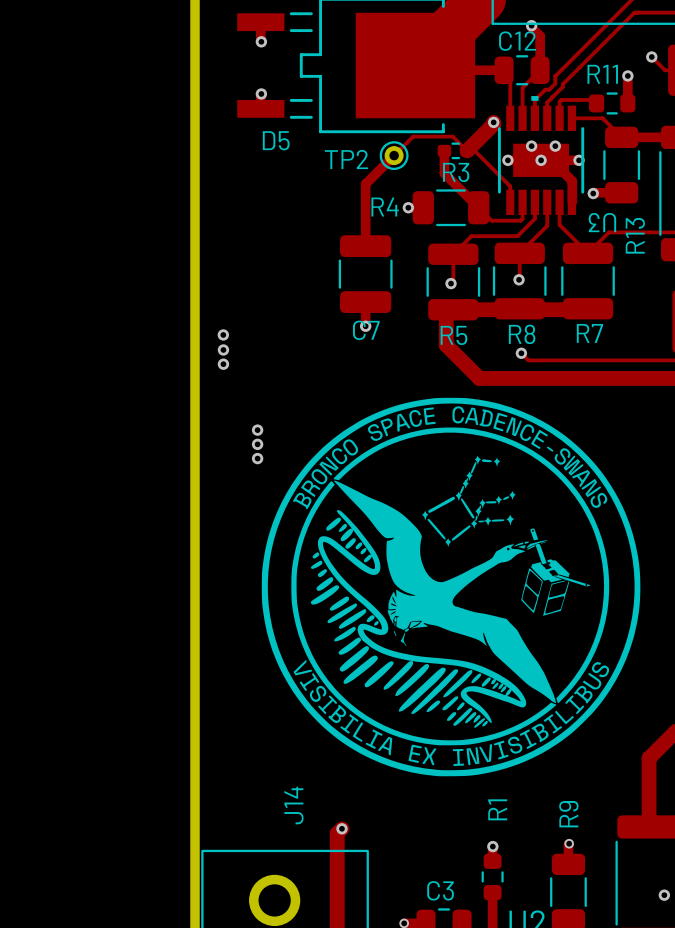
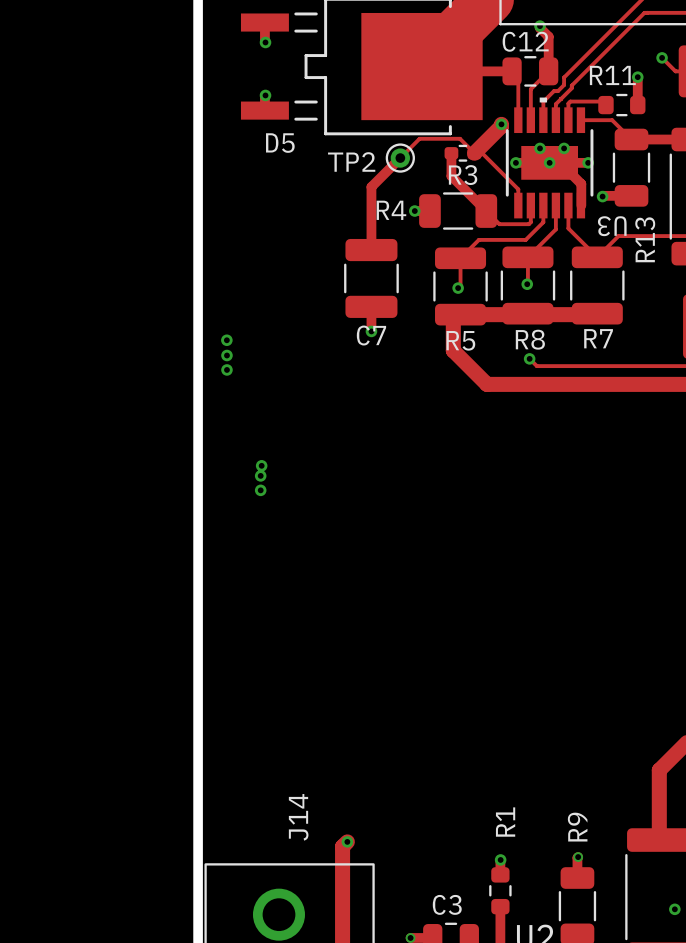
drawing: [261, 397, 641, 777] -> none
via: (257, 430) -> none
via: (257, 444) -> none
via: none -> (260, 475)
via: none -> (260, 490)

